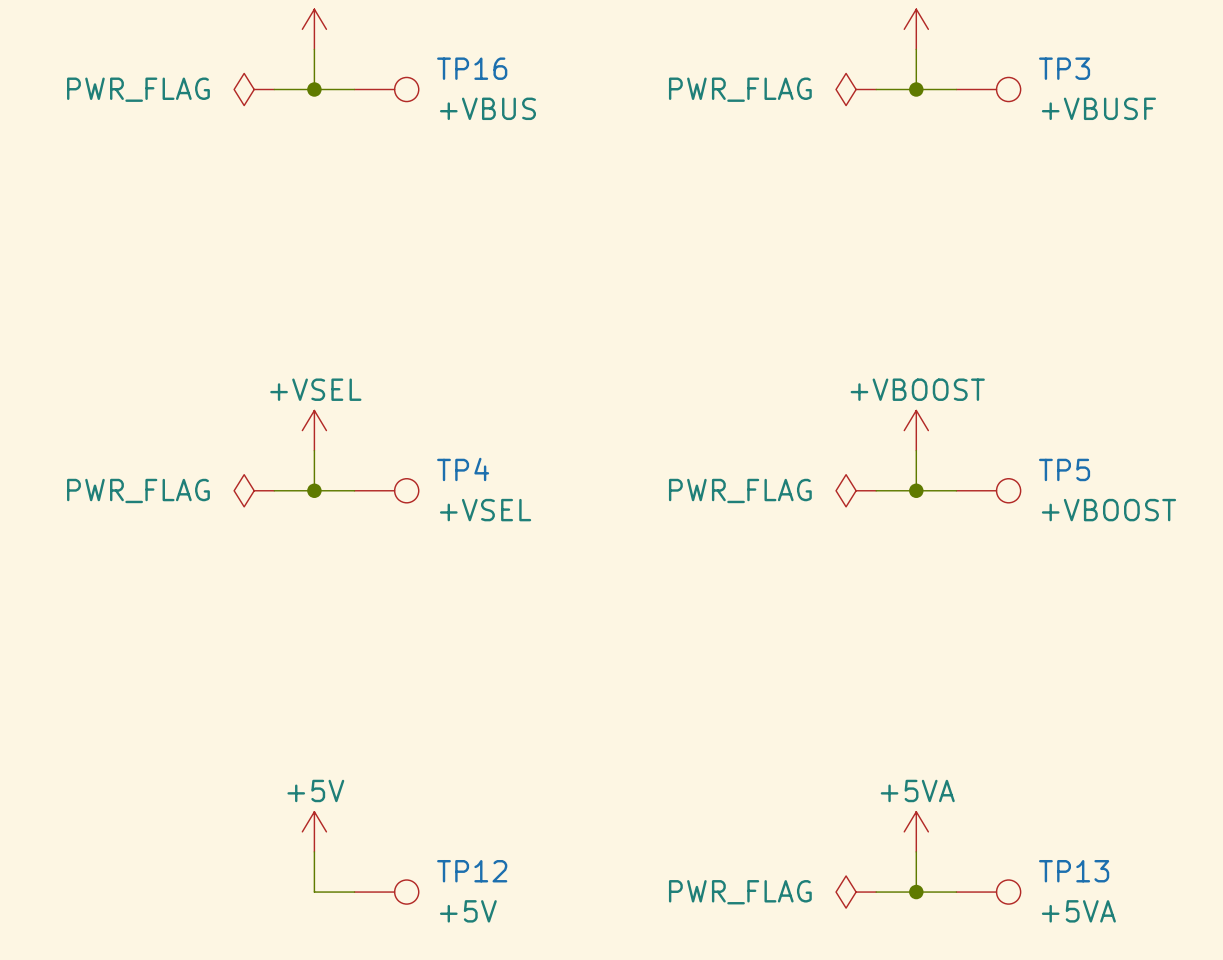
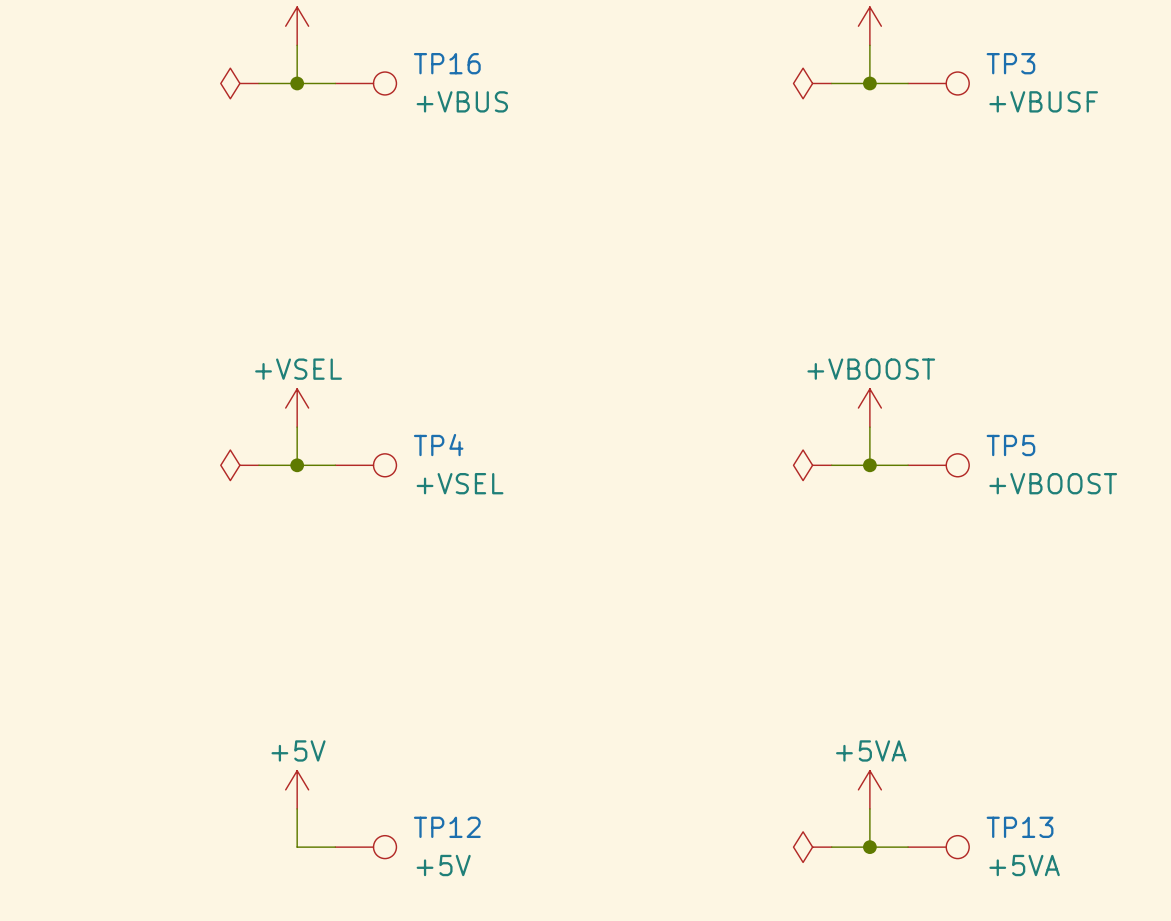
power symbol text: PWR_FLAG (138, 89) -> none
power symbol text: PWR_FLAG (740, 89) -> none
power symbol text: PWR_FLAG (138, 490) -> none
power symbol text: PWR_FLAG (740, 490) -> none
power symbol text: PWR_FLAG (740, 892) -> none

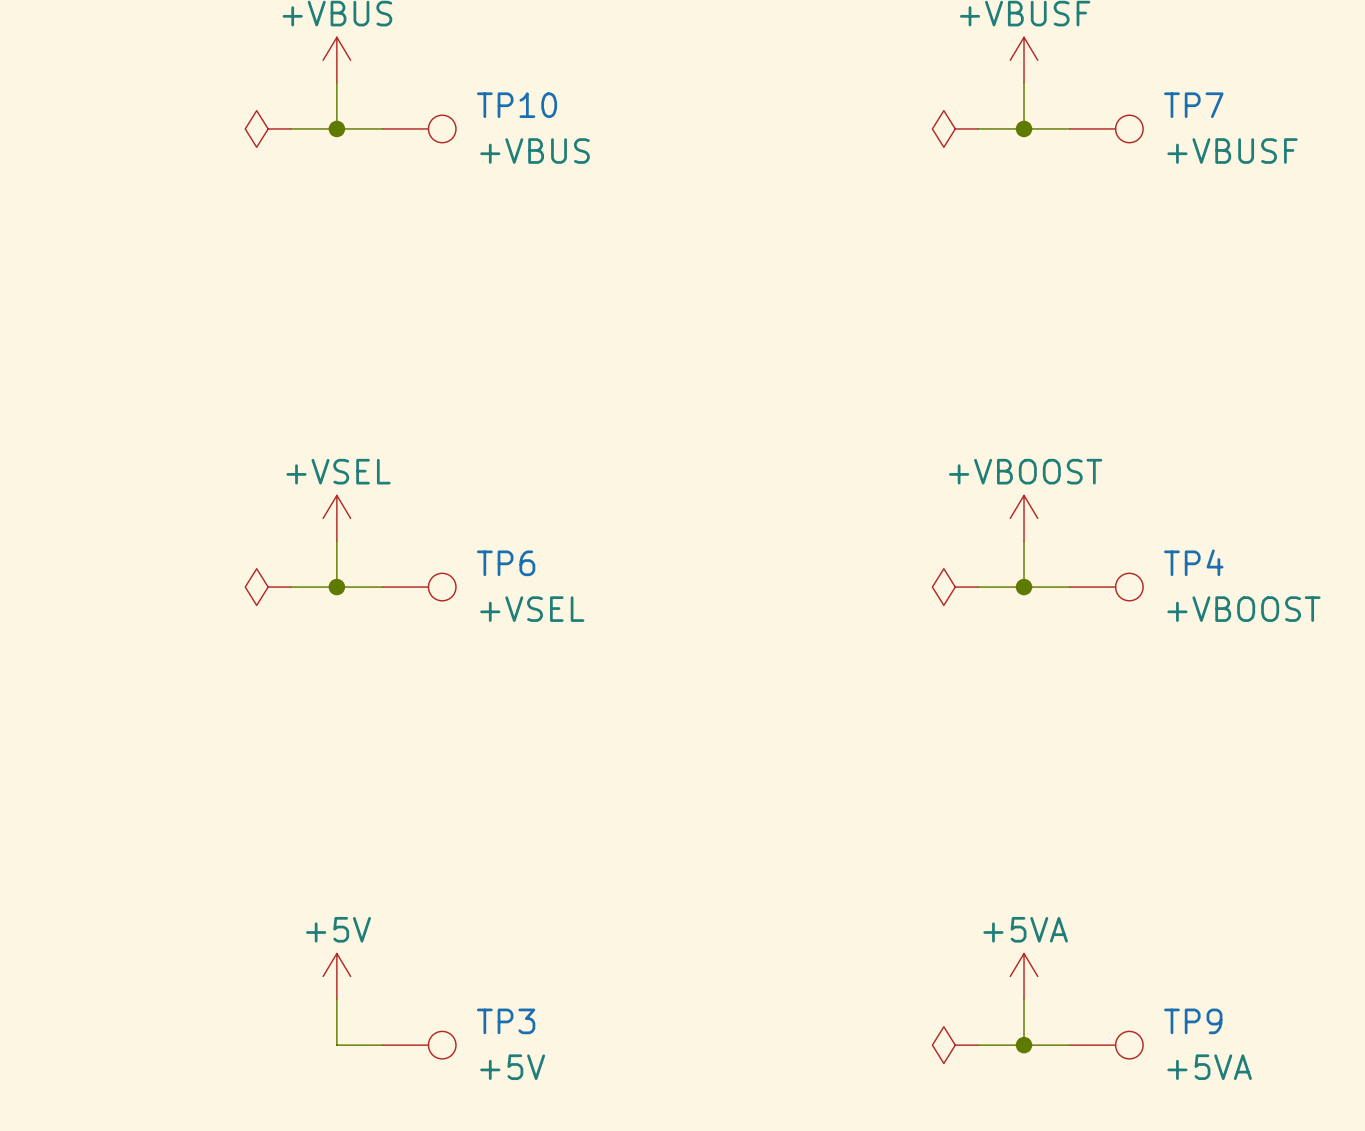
TP16 name: TP16 (447, 63) -> TP10 (517, 105)
TP3 name: TP3 (1010, 63) -> TP7 (1193, 105)
TP4 name: TP4 (438, 445) -> TP6 (506, 563)
TP5 name: TP5 (1010, 445) -> TP4 (1193, 562)
TP12 name: TP12 (447, 827) -> TP3 (506, 1021)
TP13 name: TP13 (1020, 827) -> TP9 (1193, 1021)

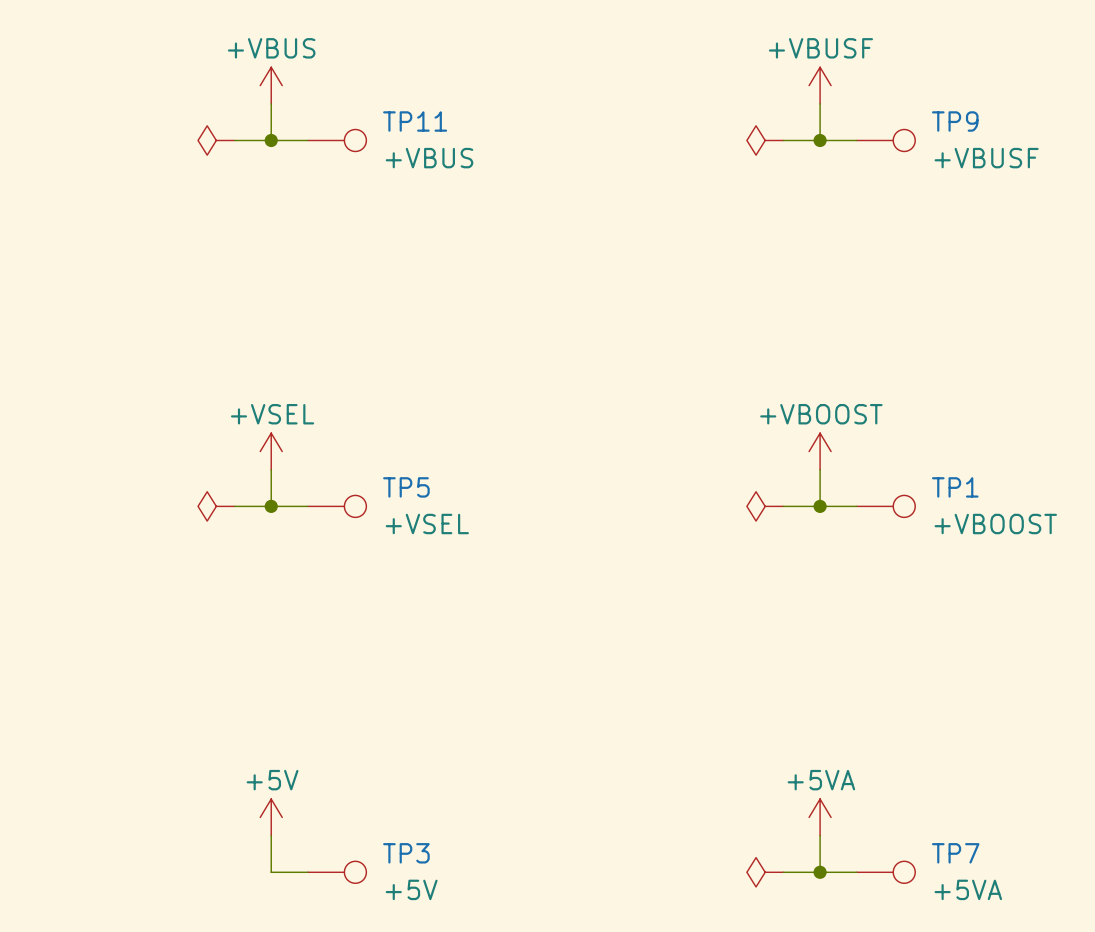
TP10 name: TP10 (517, 105) -> TP11 (415, 121)
TP7 name: TP7 (1193, 105) -> TP9 (955, 121)
TP4 name: TP4 (1193, 562) -> TP1 (955, 487)
TP6 name: TP6 (506, 563) -> TP5 (406, 487)
TP9 name: TP9 (1193, 1021) -> TP7 (955, 853)

